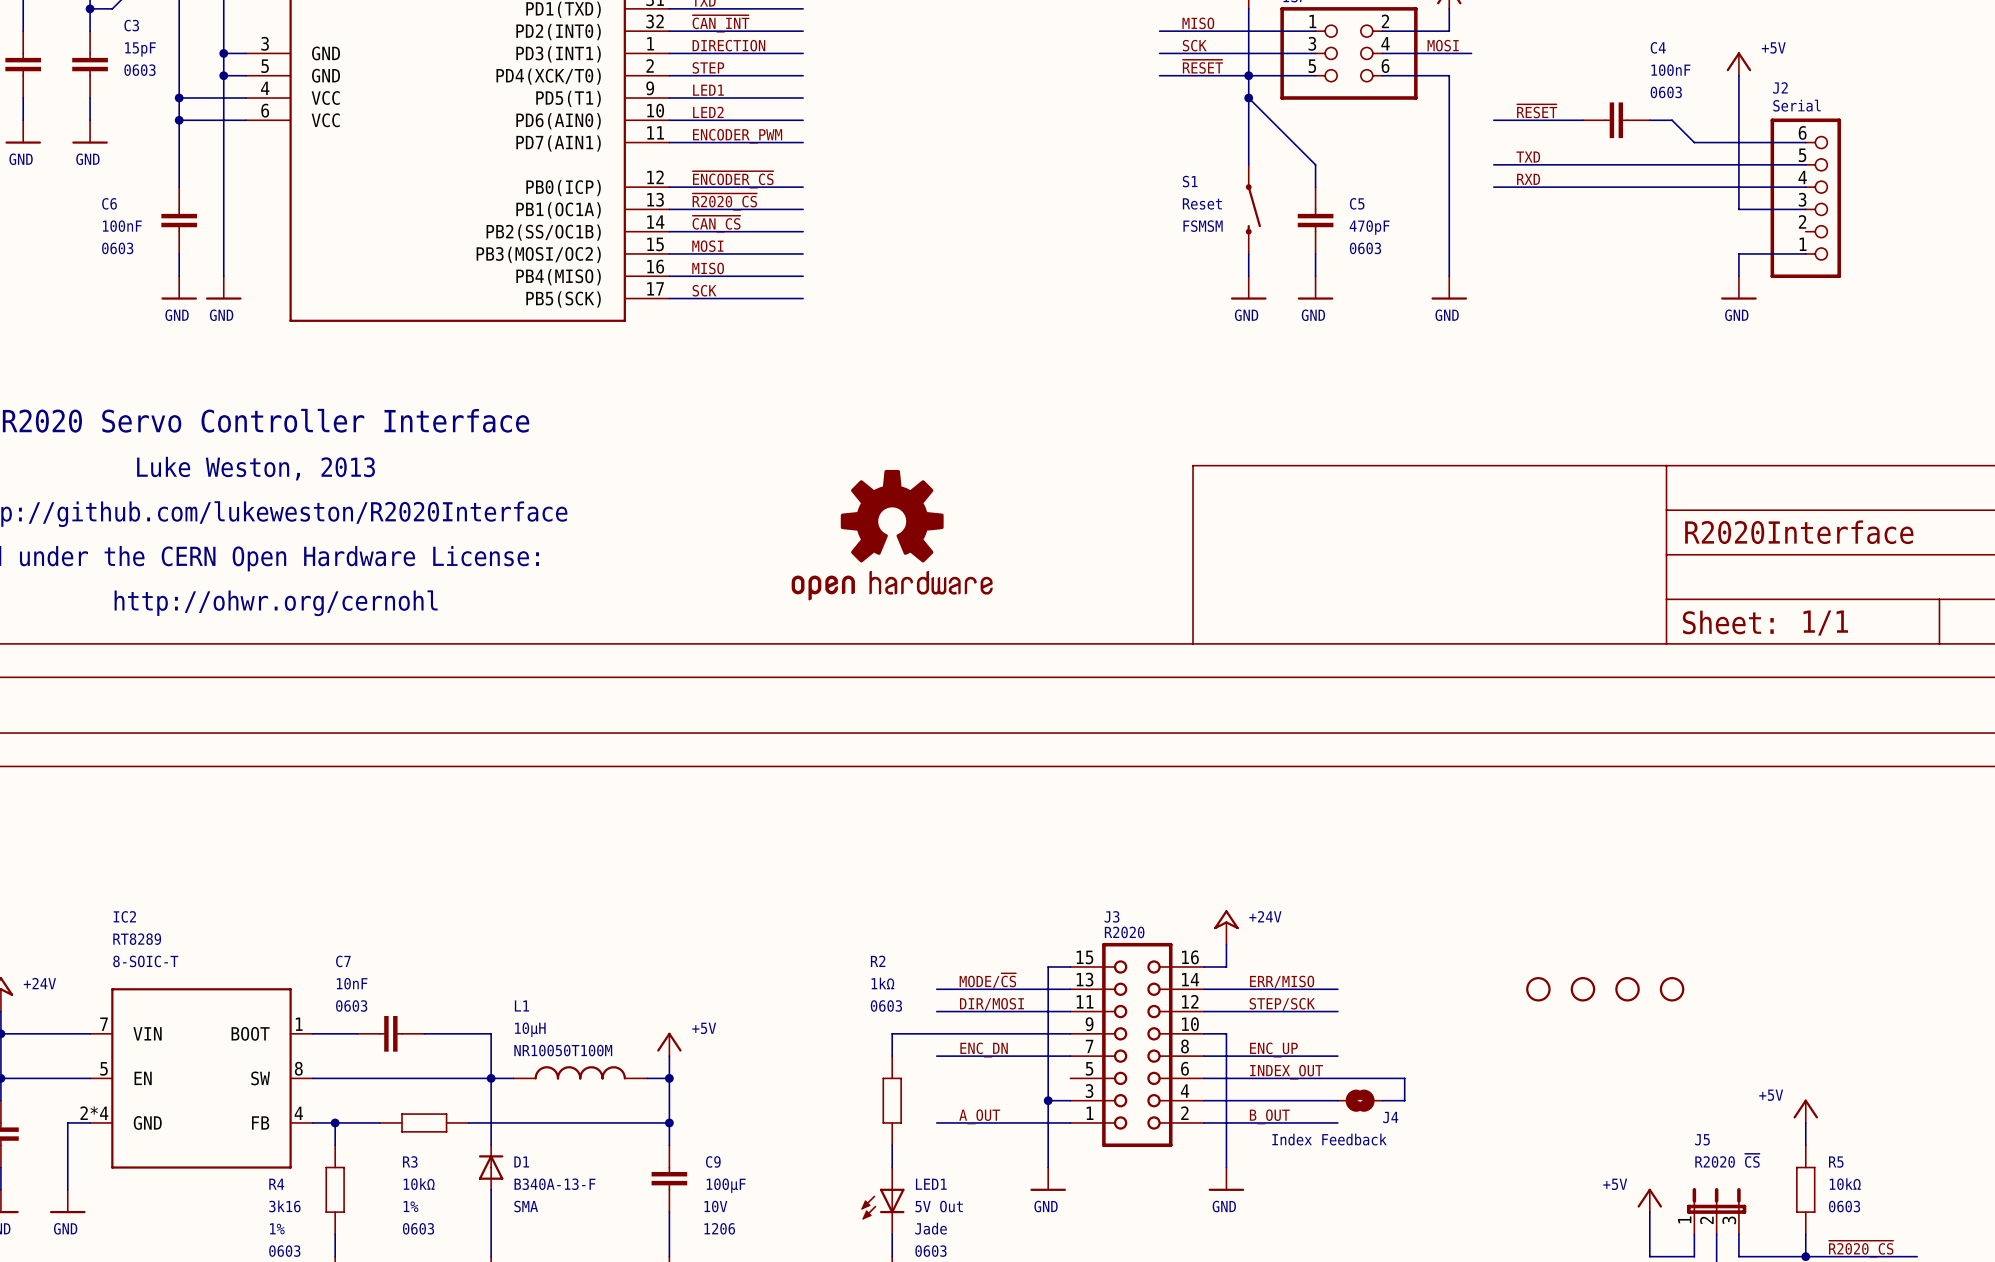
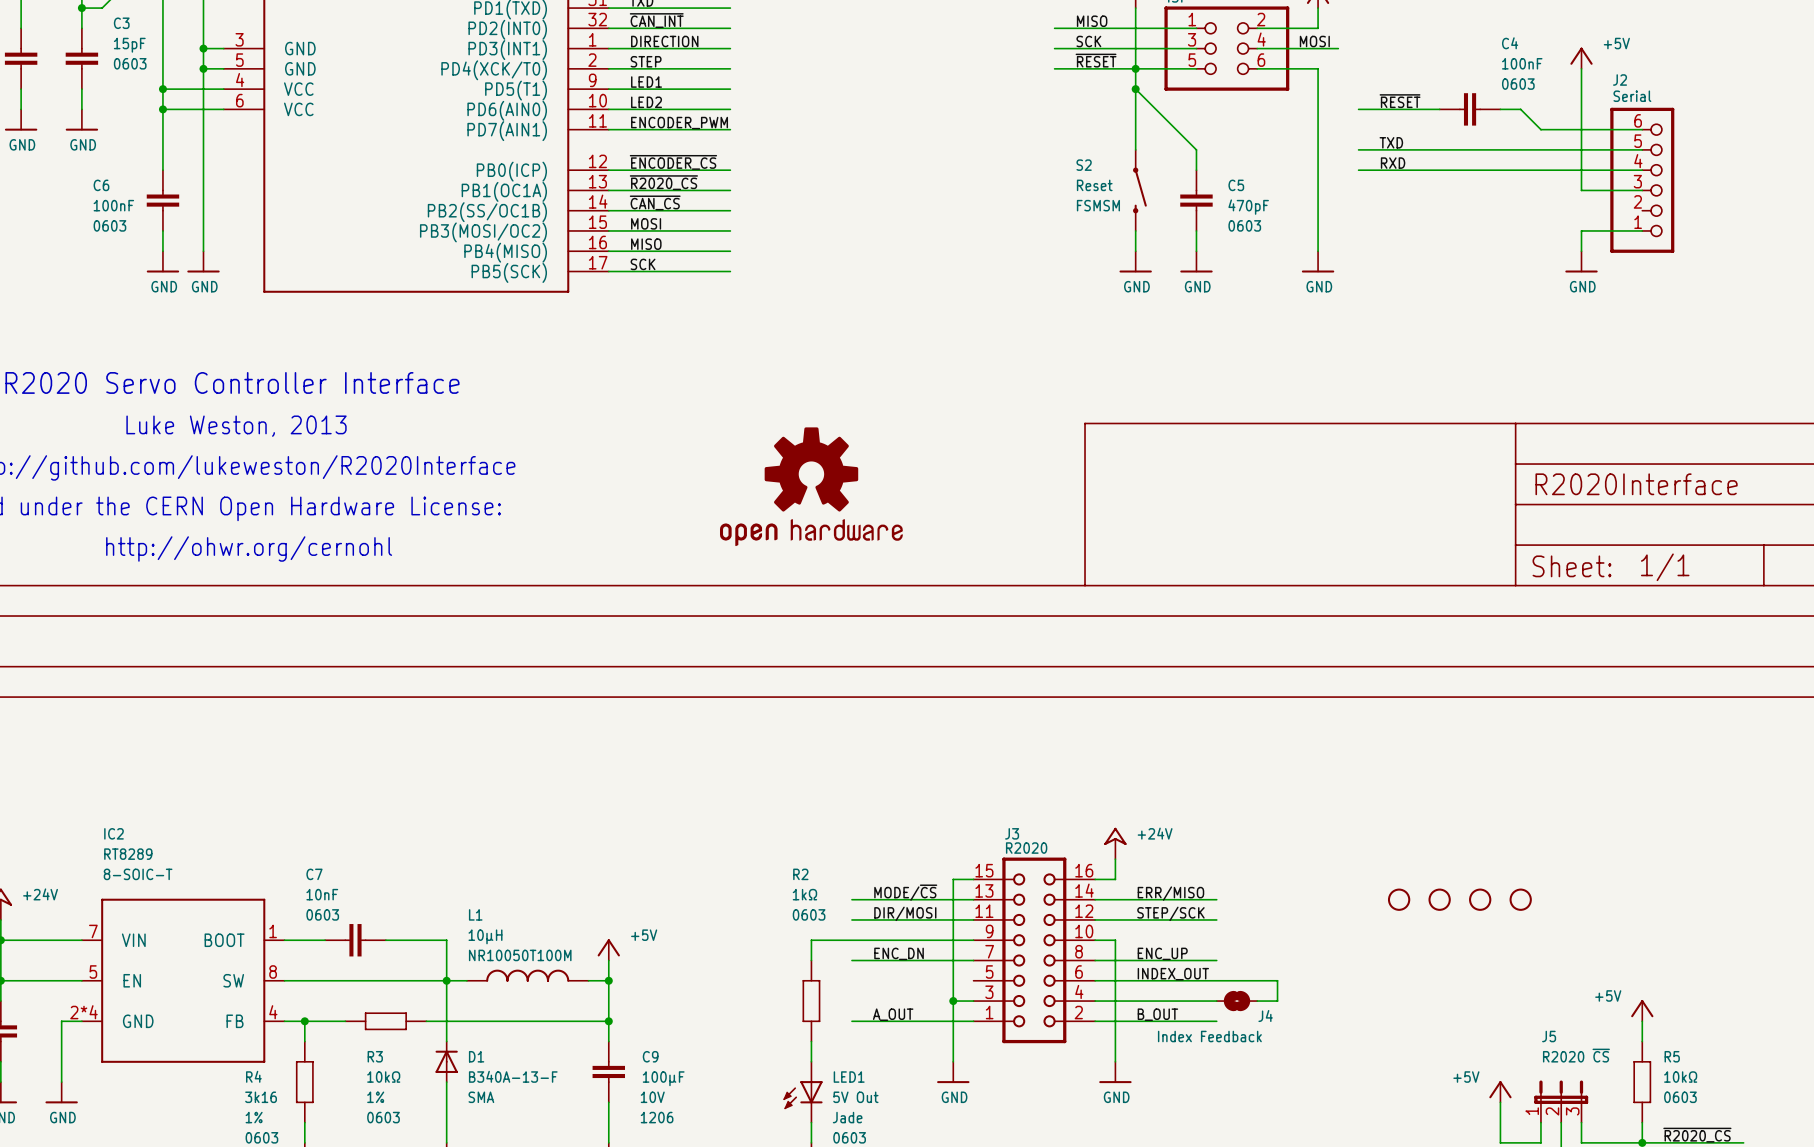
S1 name: S1 (1190, 181) -> S2 (1084, 165)

